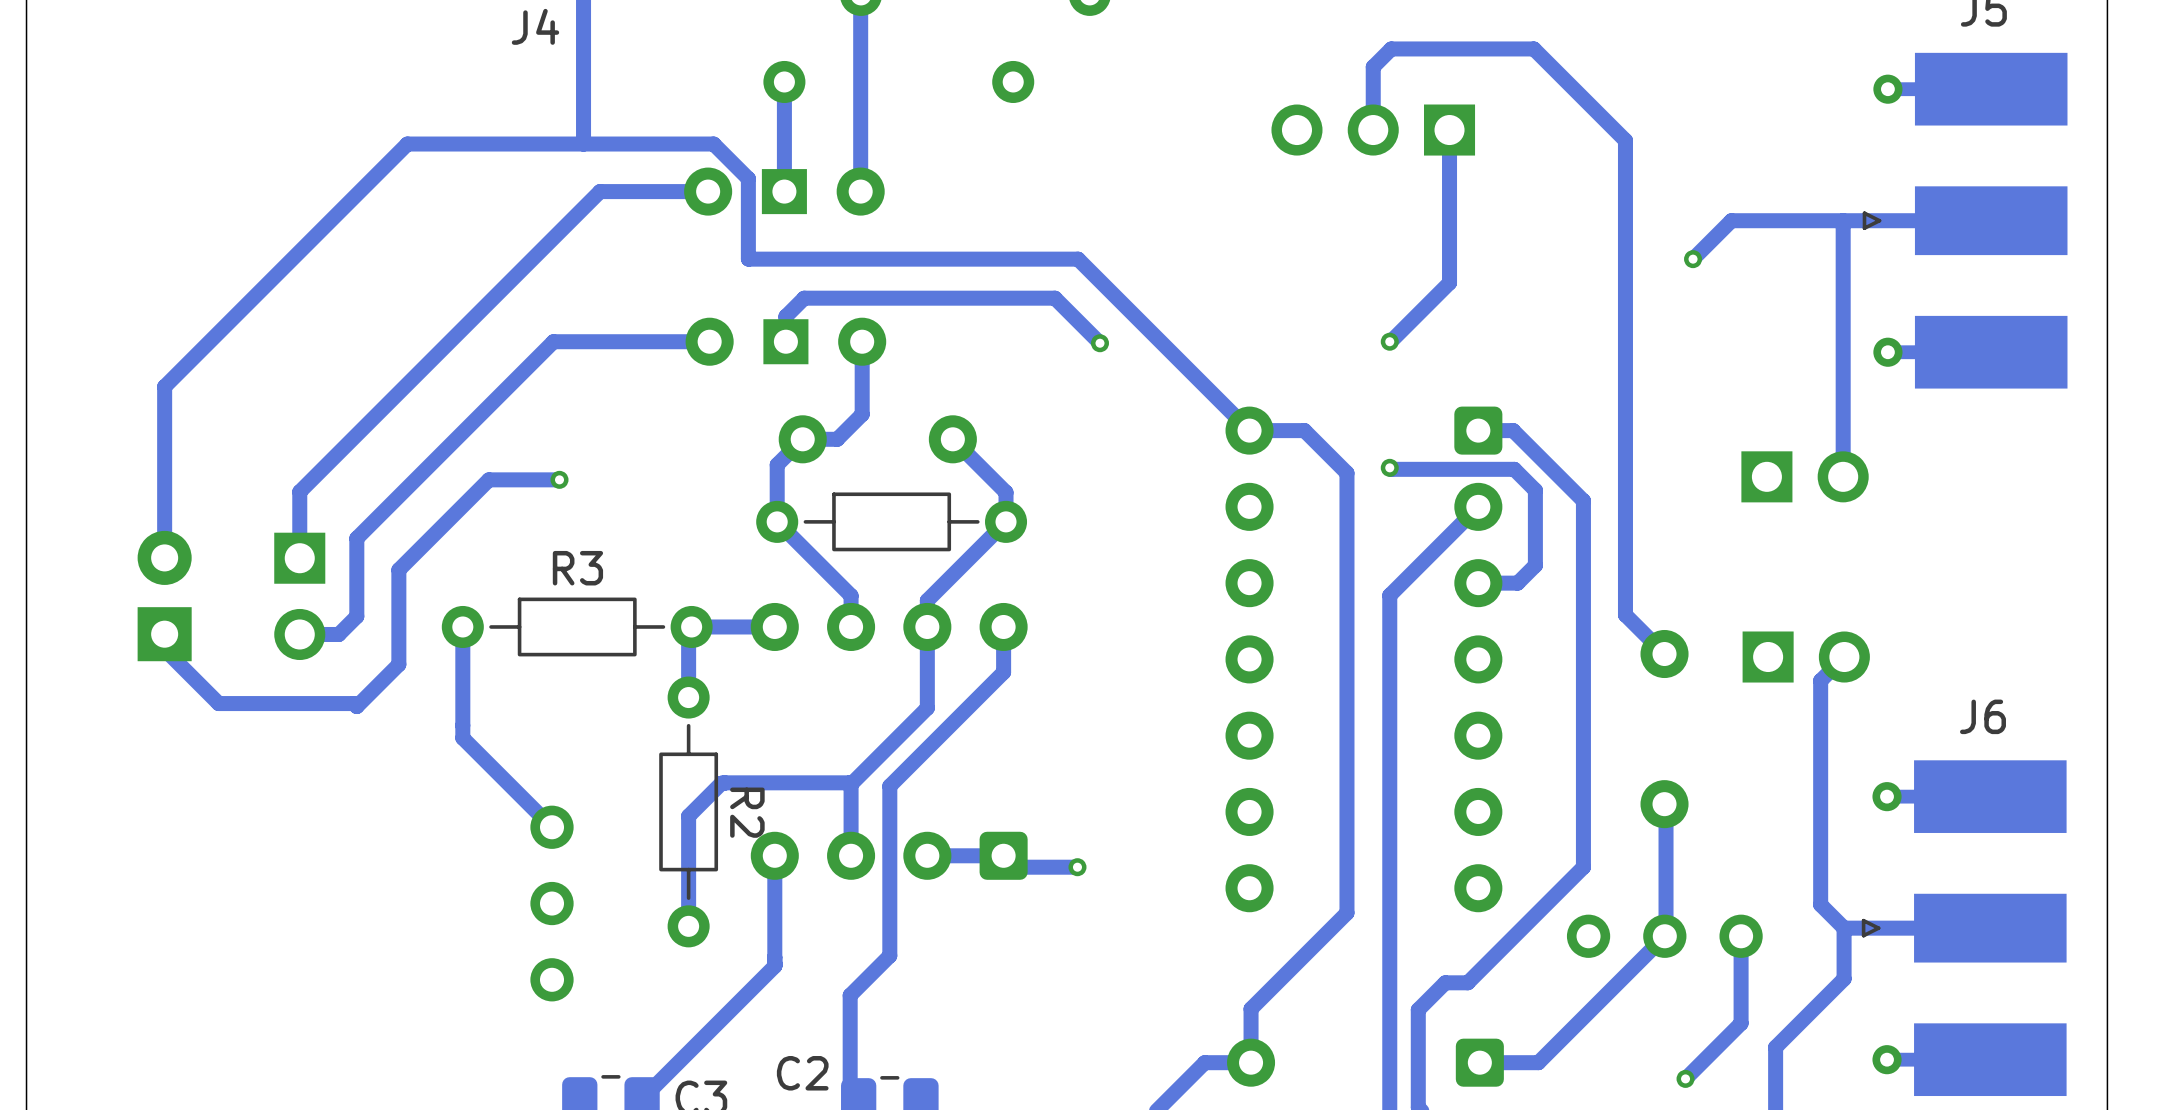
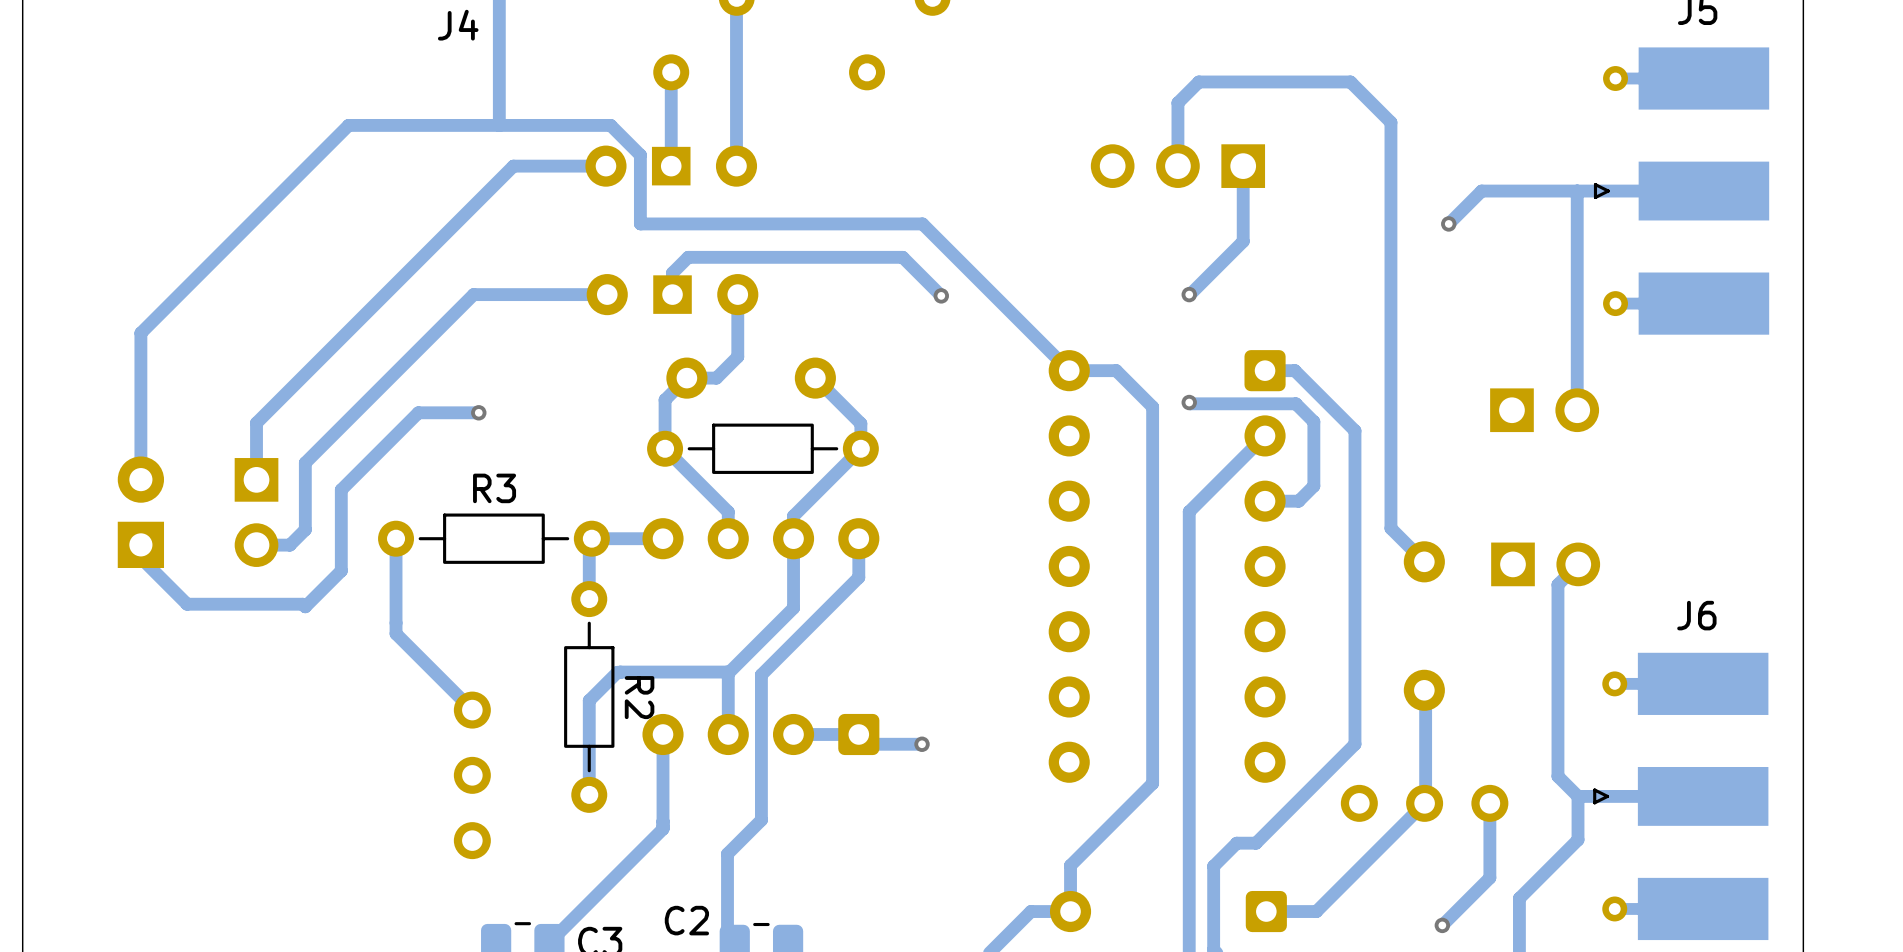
track: (1578, 93) (1533, 48) (1391, 48) (1373, 66) (1373, 130) -> (1350, 81) (1198, 81) (1177, 102) (1177, 166)
part position: (1373, 130) -> (1177, 166)
track: (1449, 130) (1449, 282) -> (1243, 166) (1243, 241) (1240, 244)

